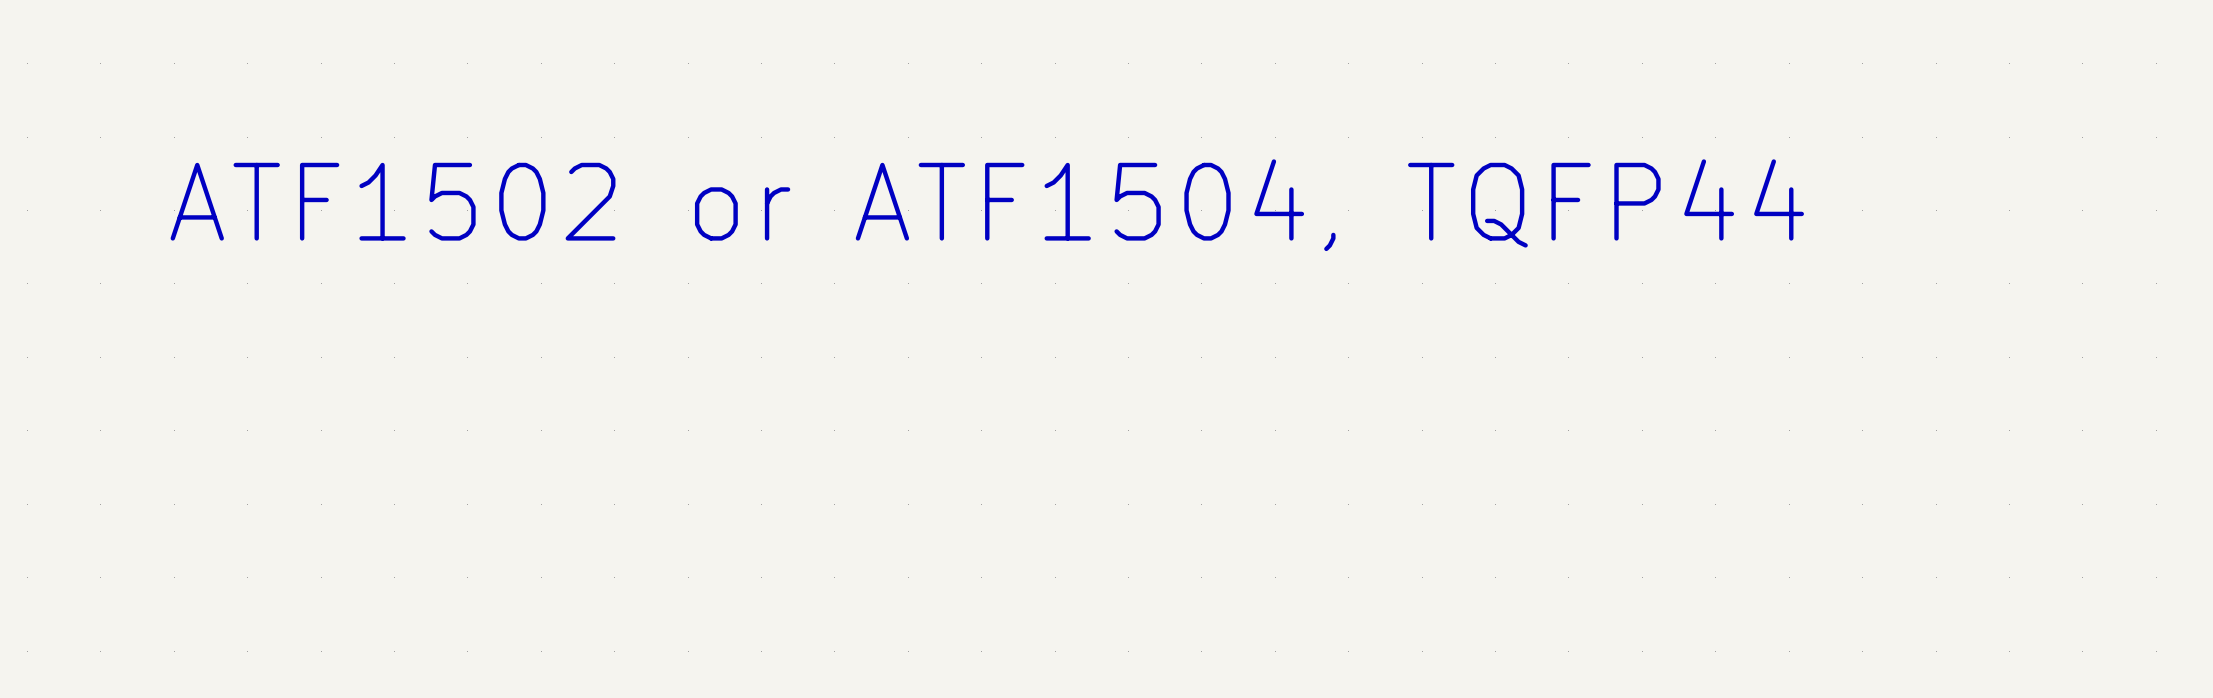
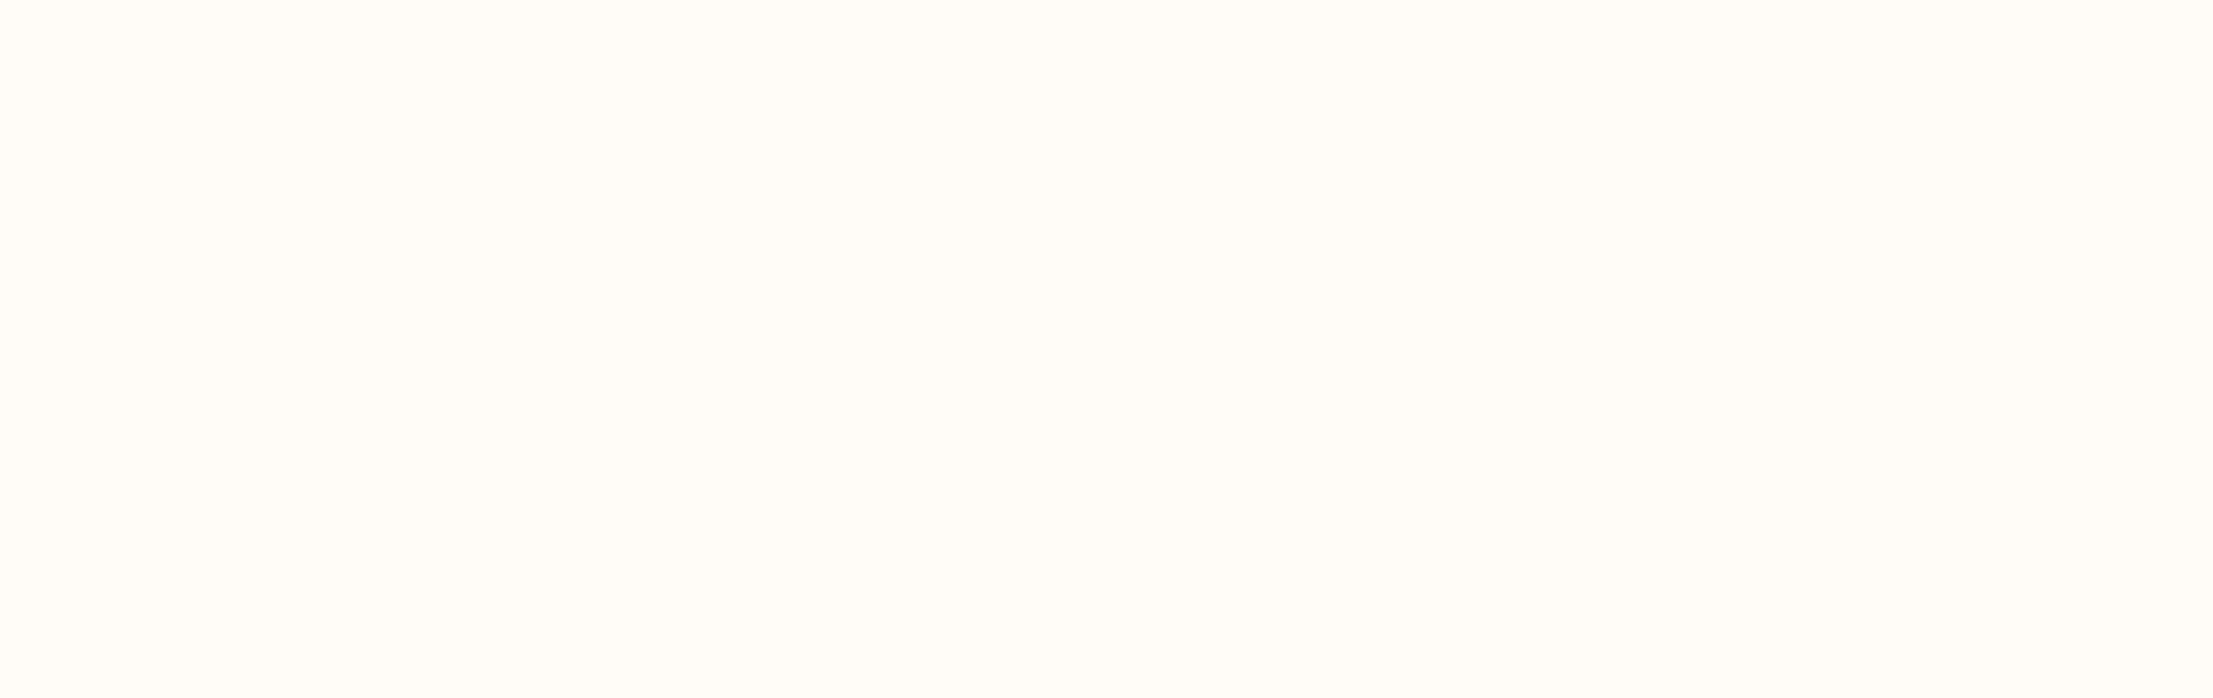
text: ATF1502 or ATF1504, TQFP44 (987, 205) -> none

